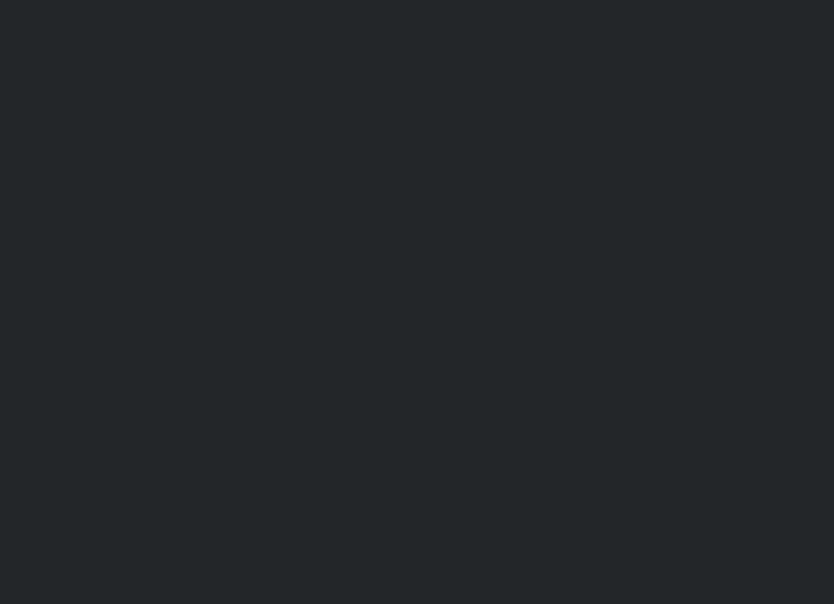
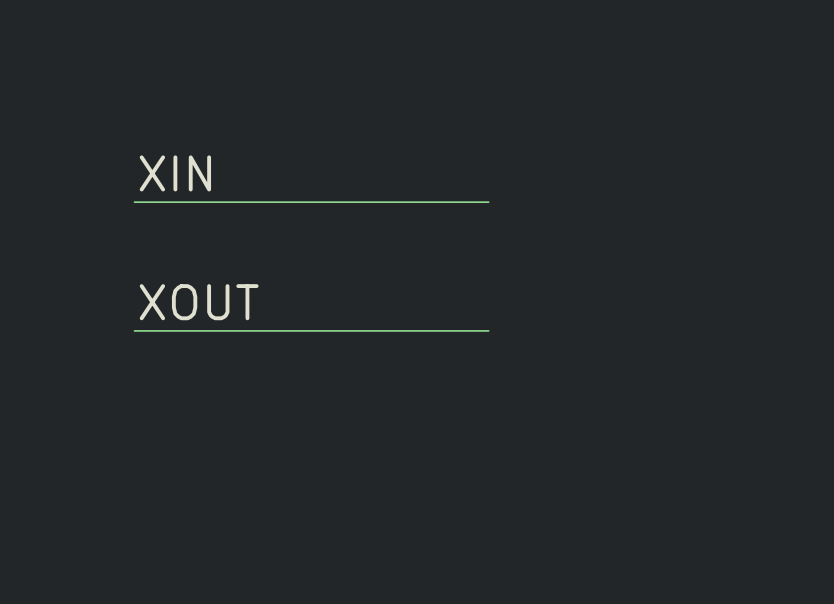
label: none -> XIN (175, 173)
wire: none -> (134, 202) (488, 202)
label: none -> XOUT (199, 302)
wire: none -> (134, 330) (488, 330)

